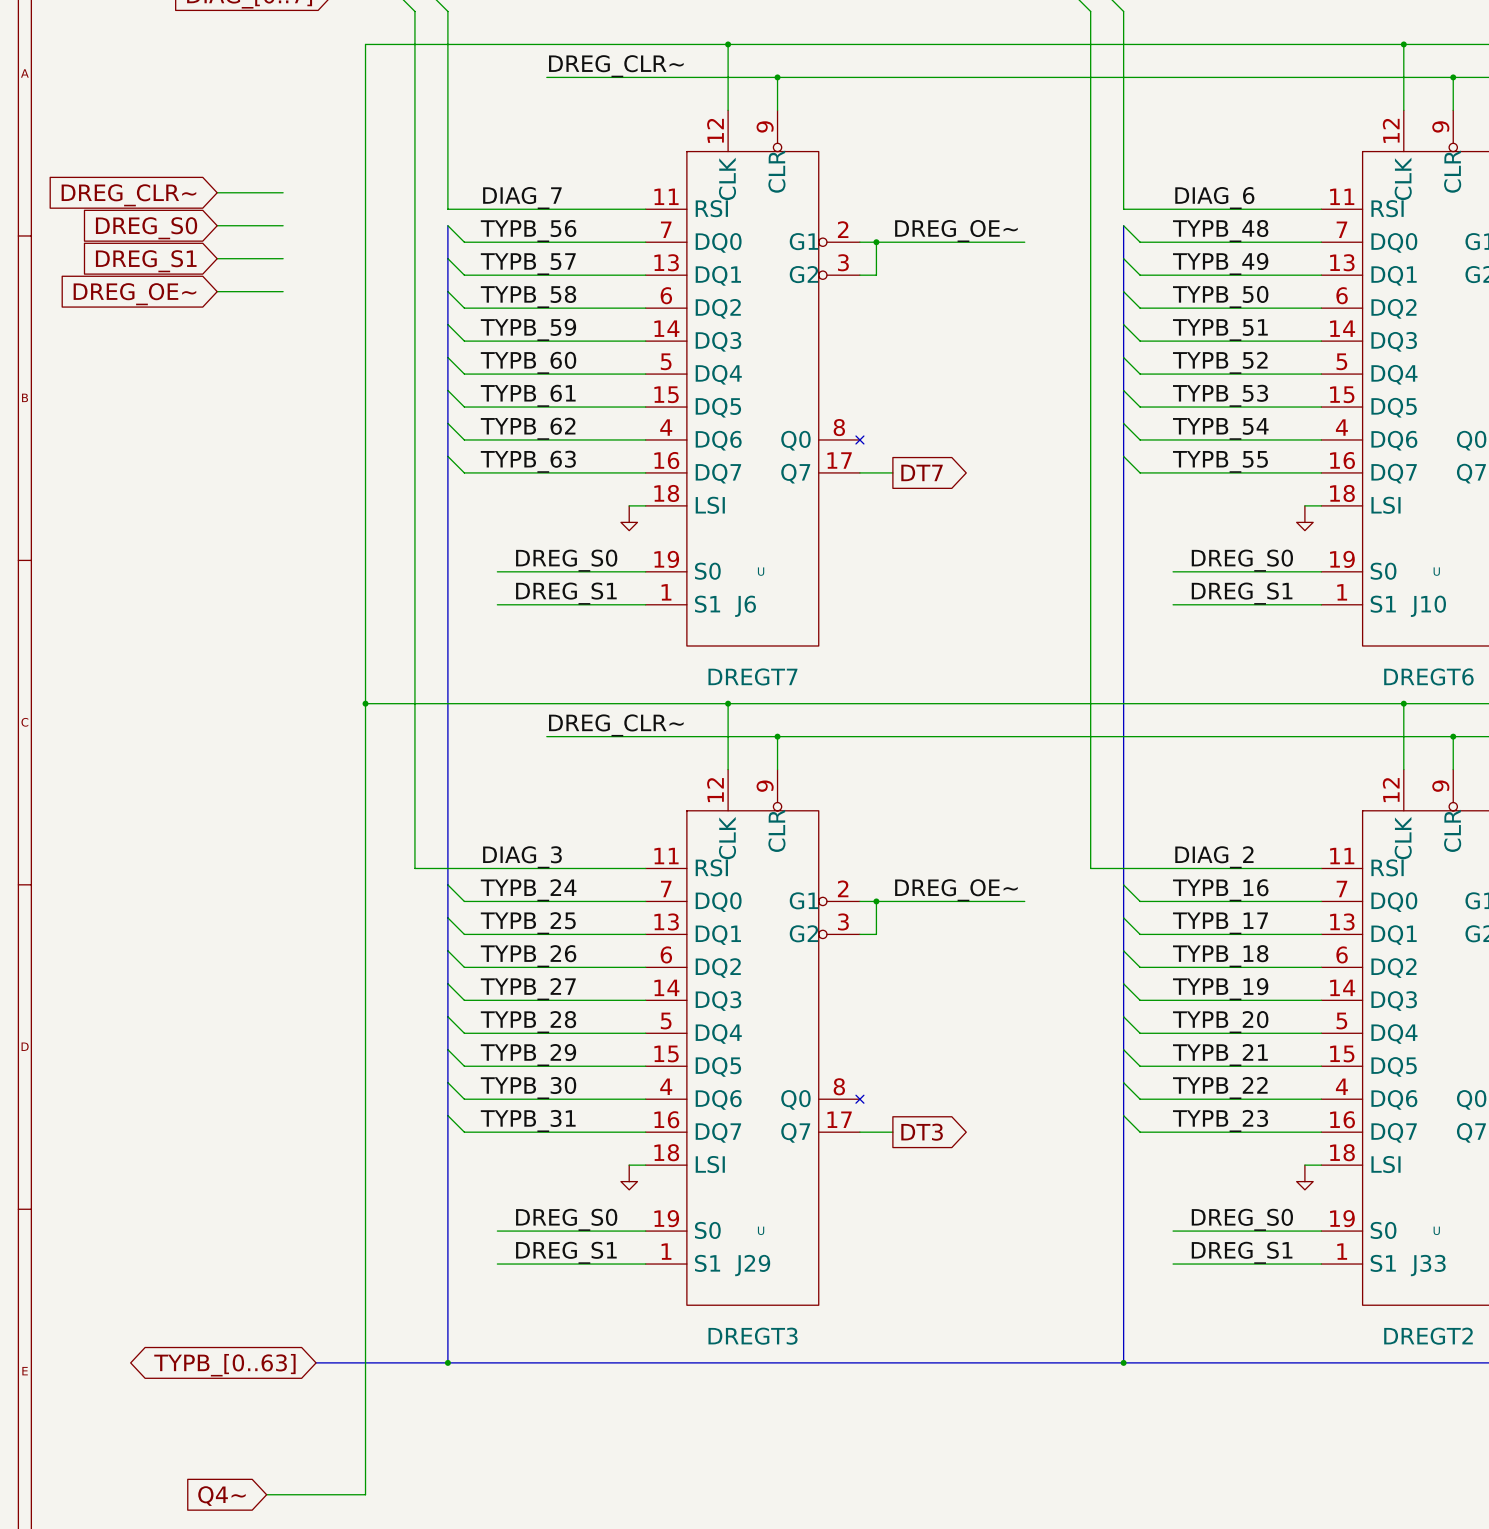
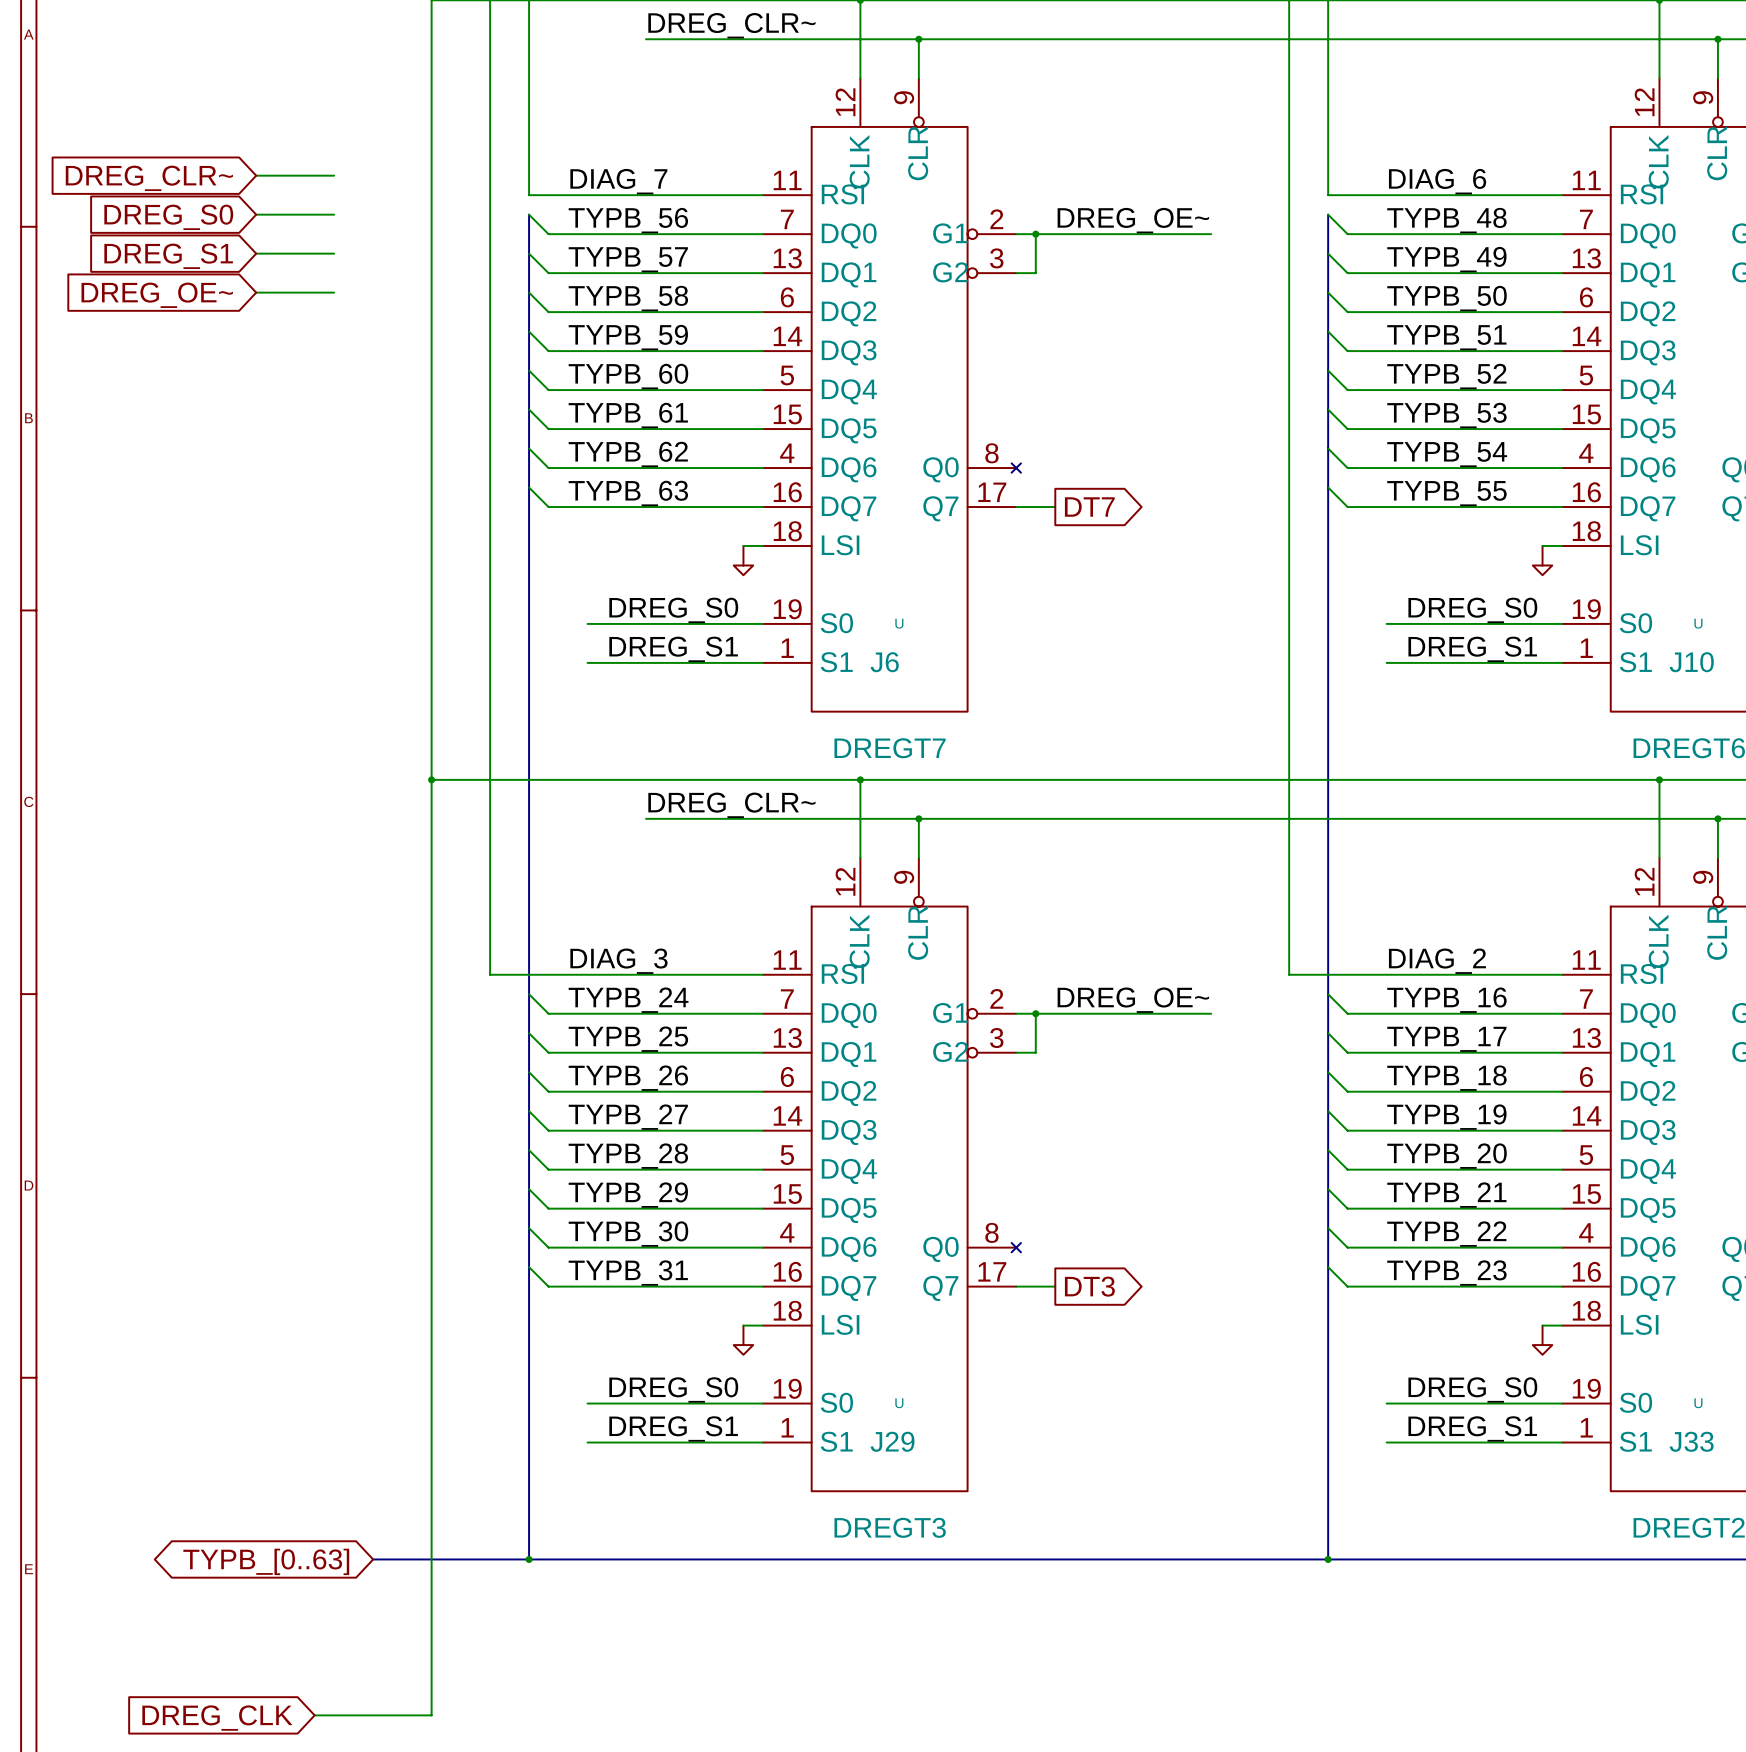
global label: Q4~ (221, 1496) -> DREG_CLK (217, 1718)

